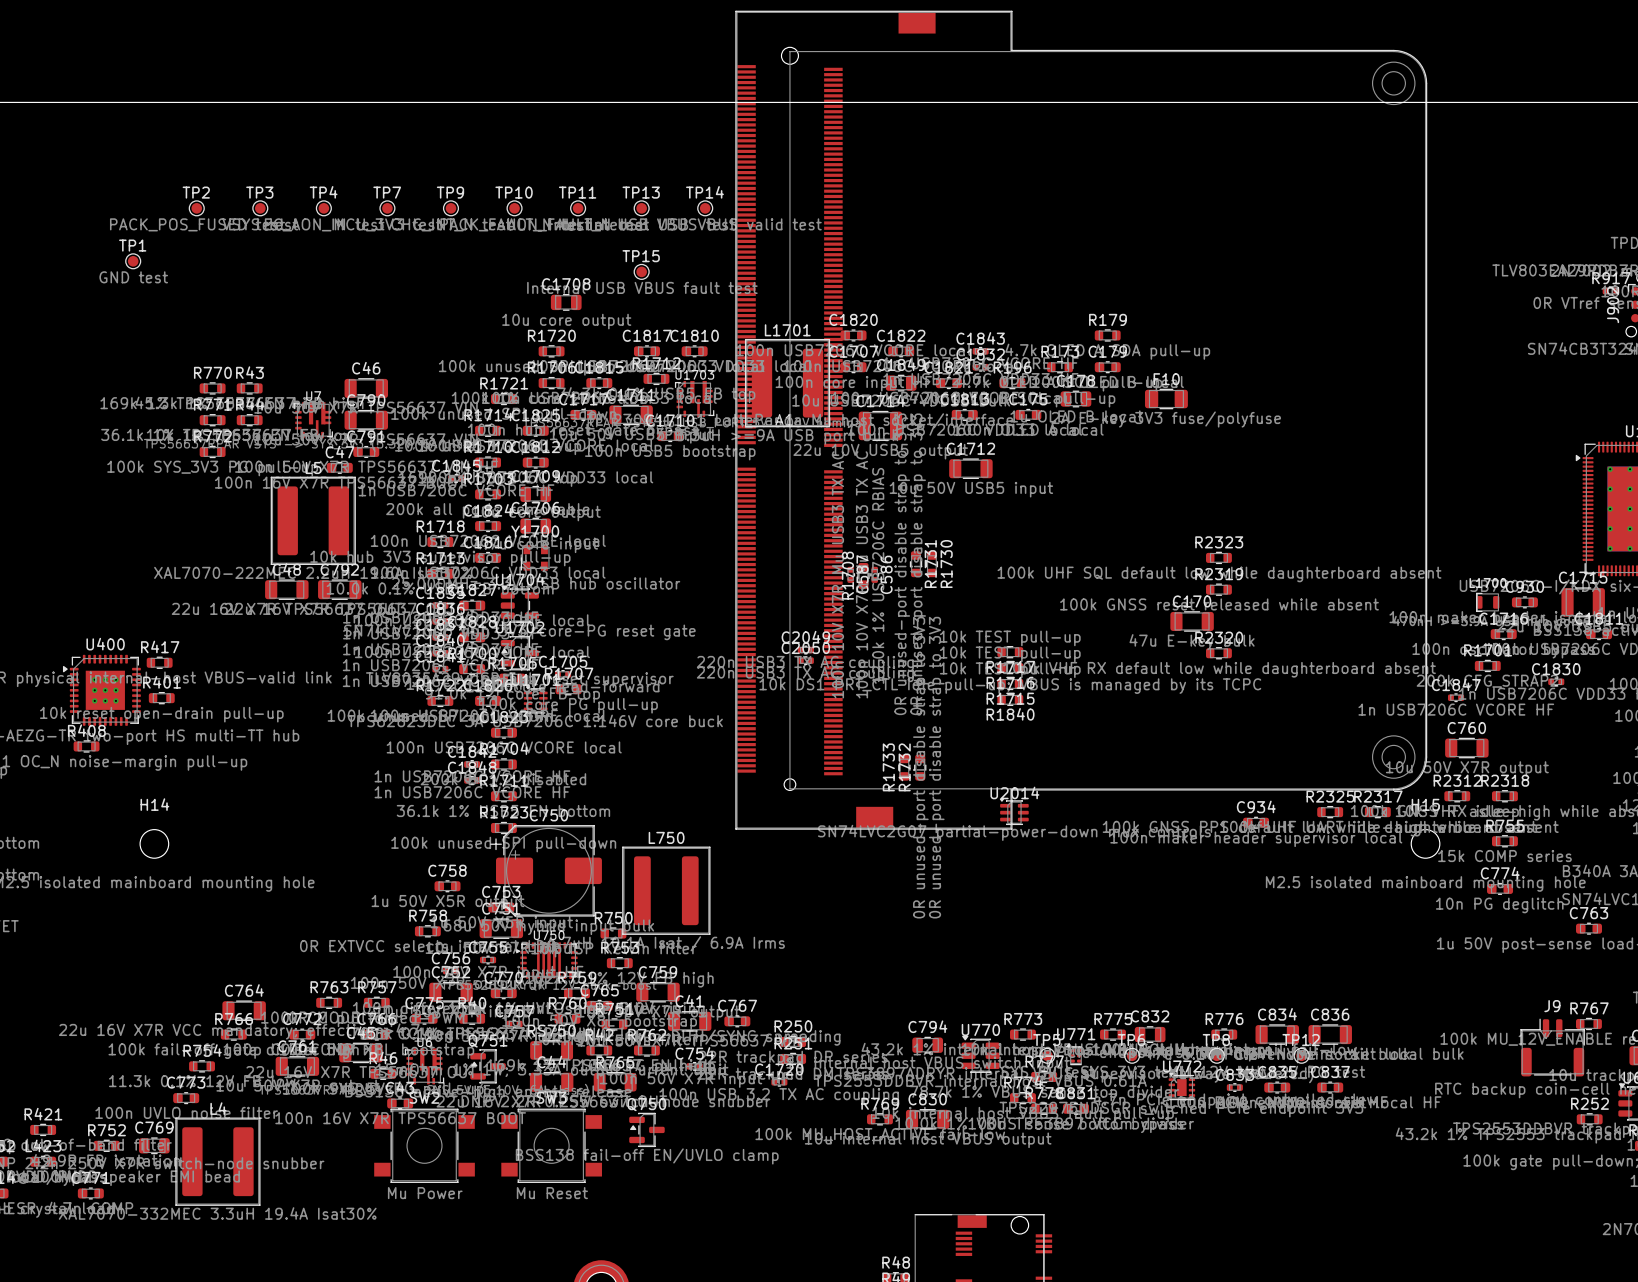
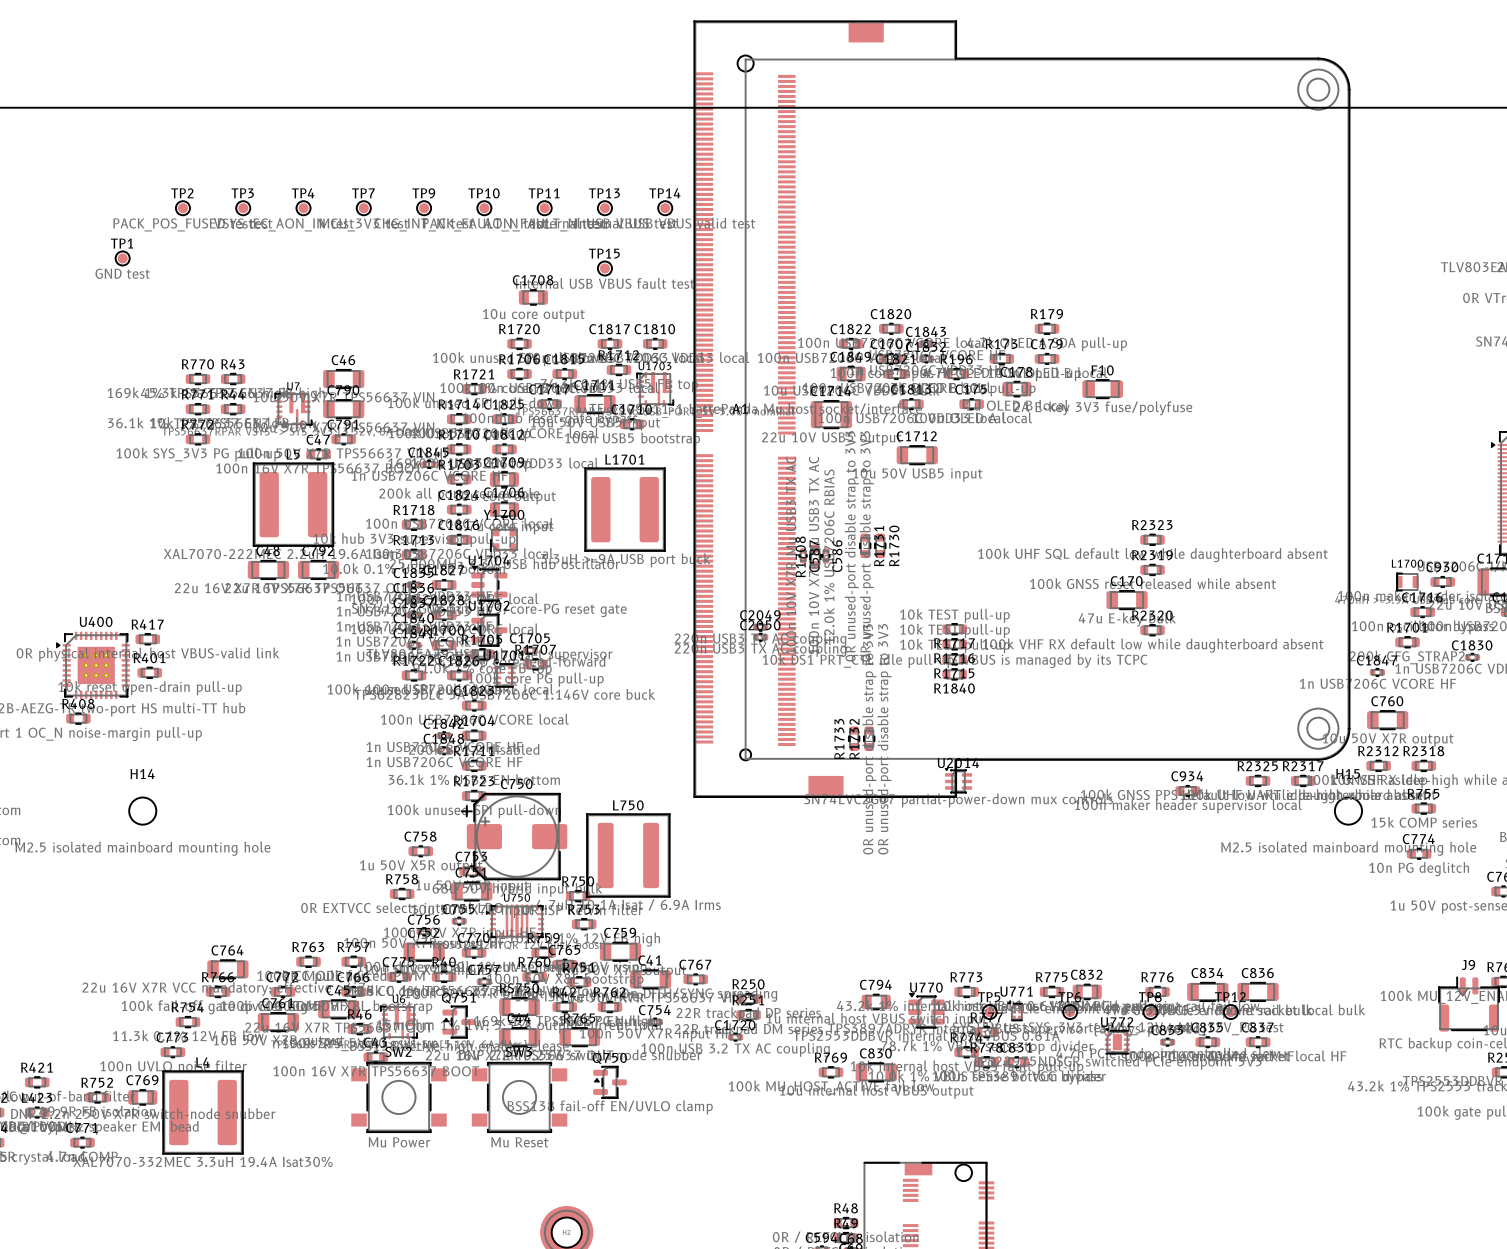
C1820 position: (853, 335) -> (891, 328)
C1707 position: (853, 367) -> (891, 358)
L1701 position: (787, 383) -> (625, 509)

